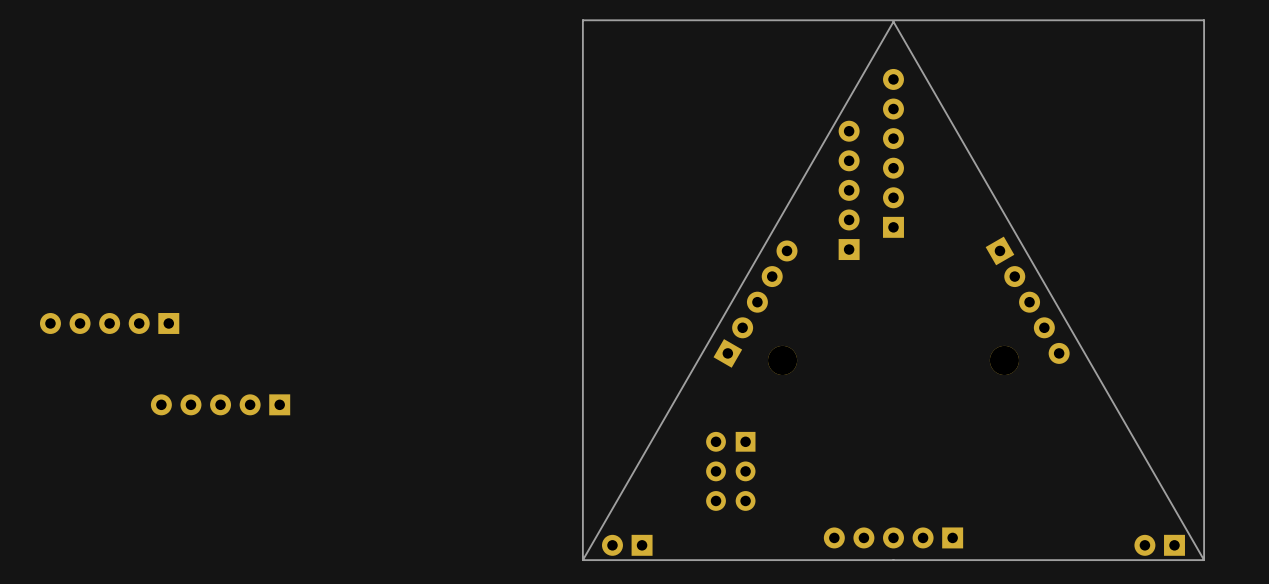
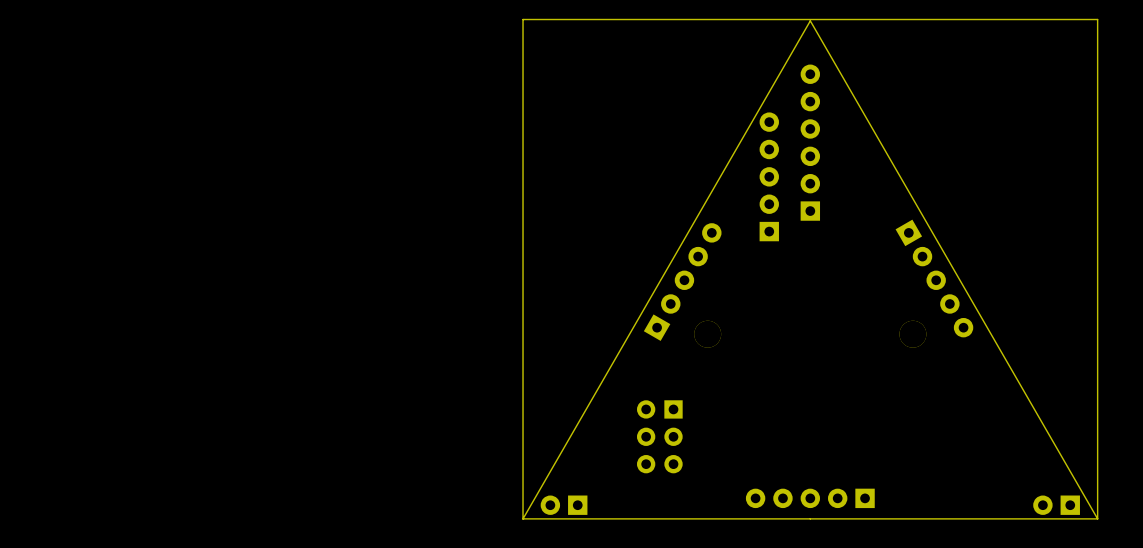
part: (109, 323) -> none
part: (220, 404) -> none

